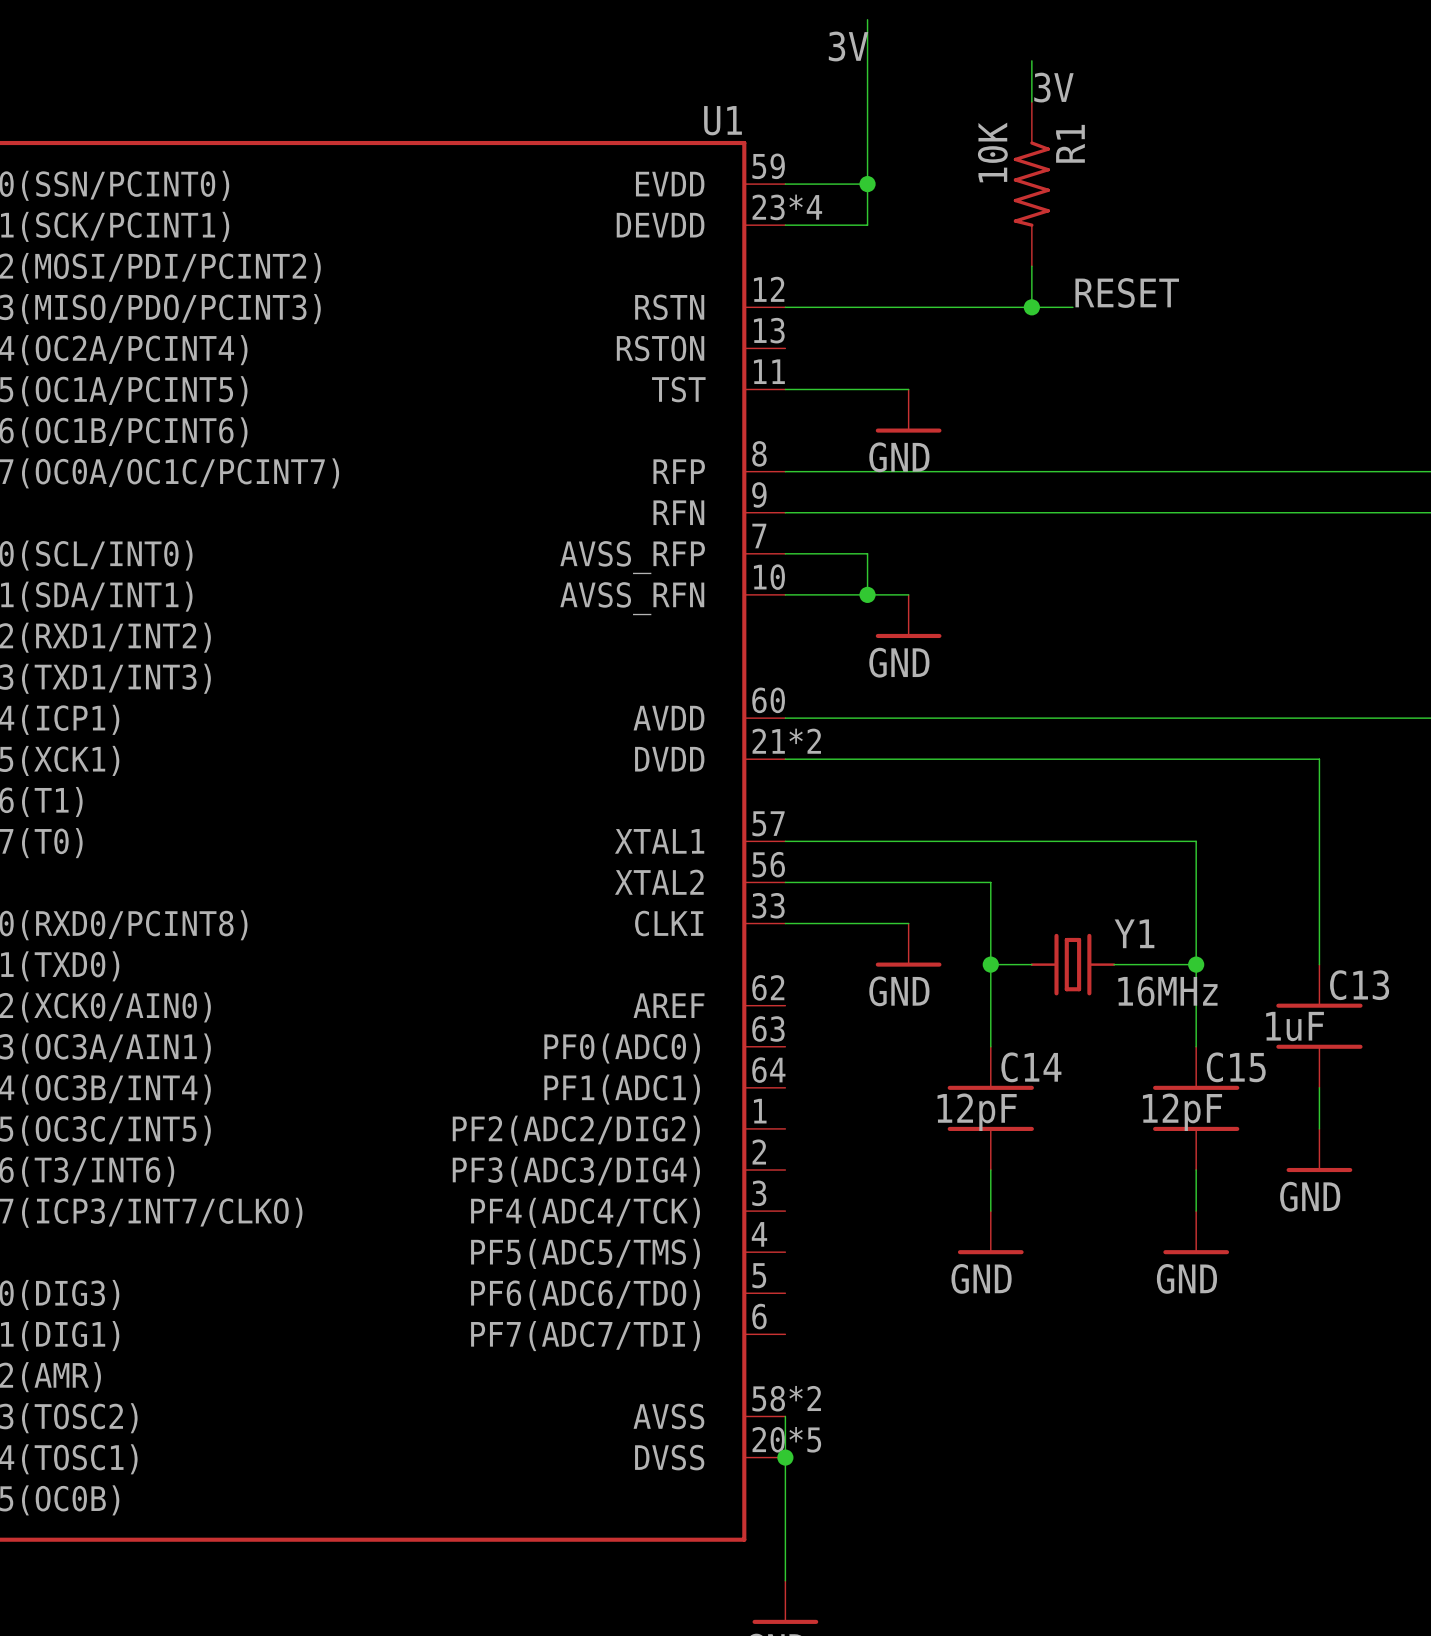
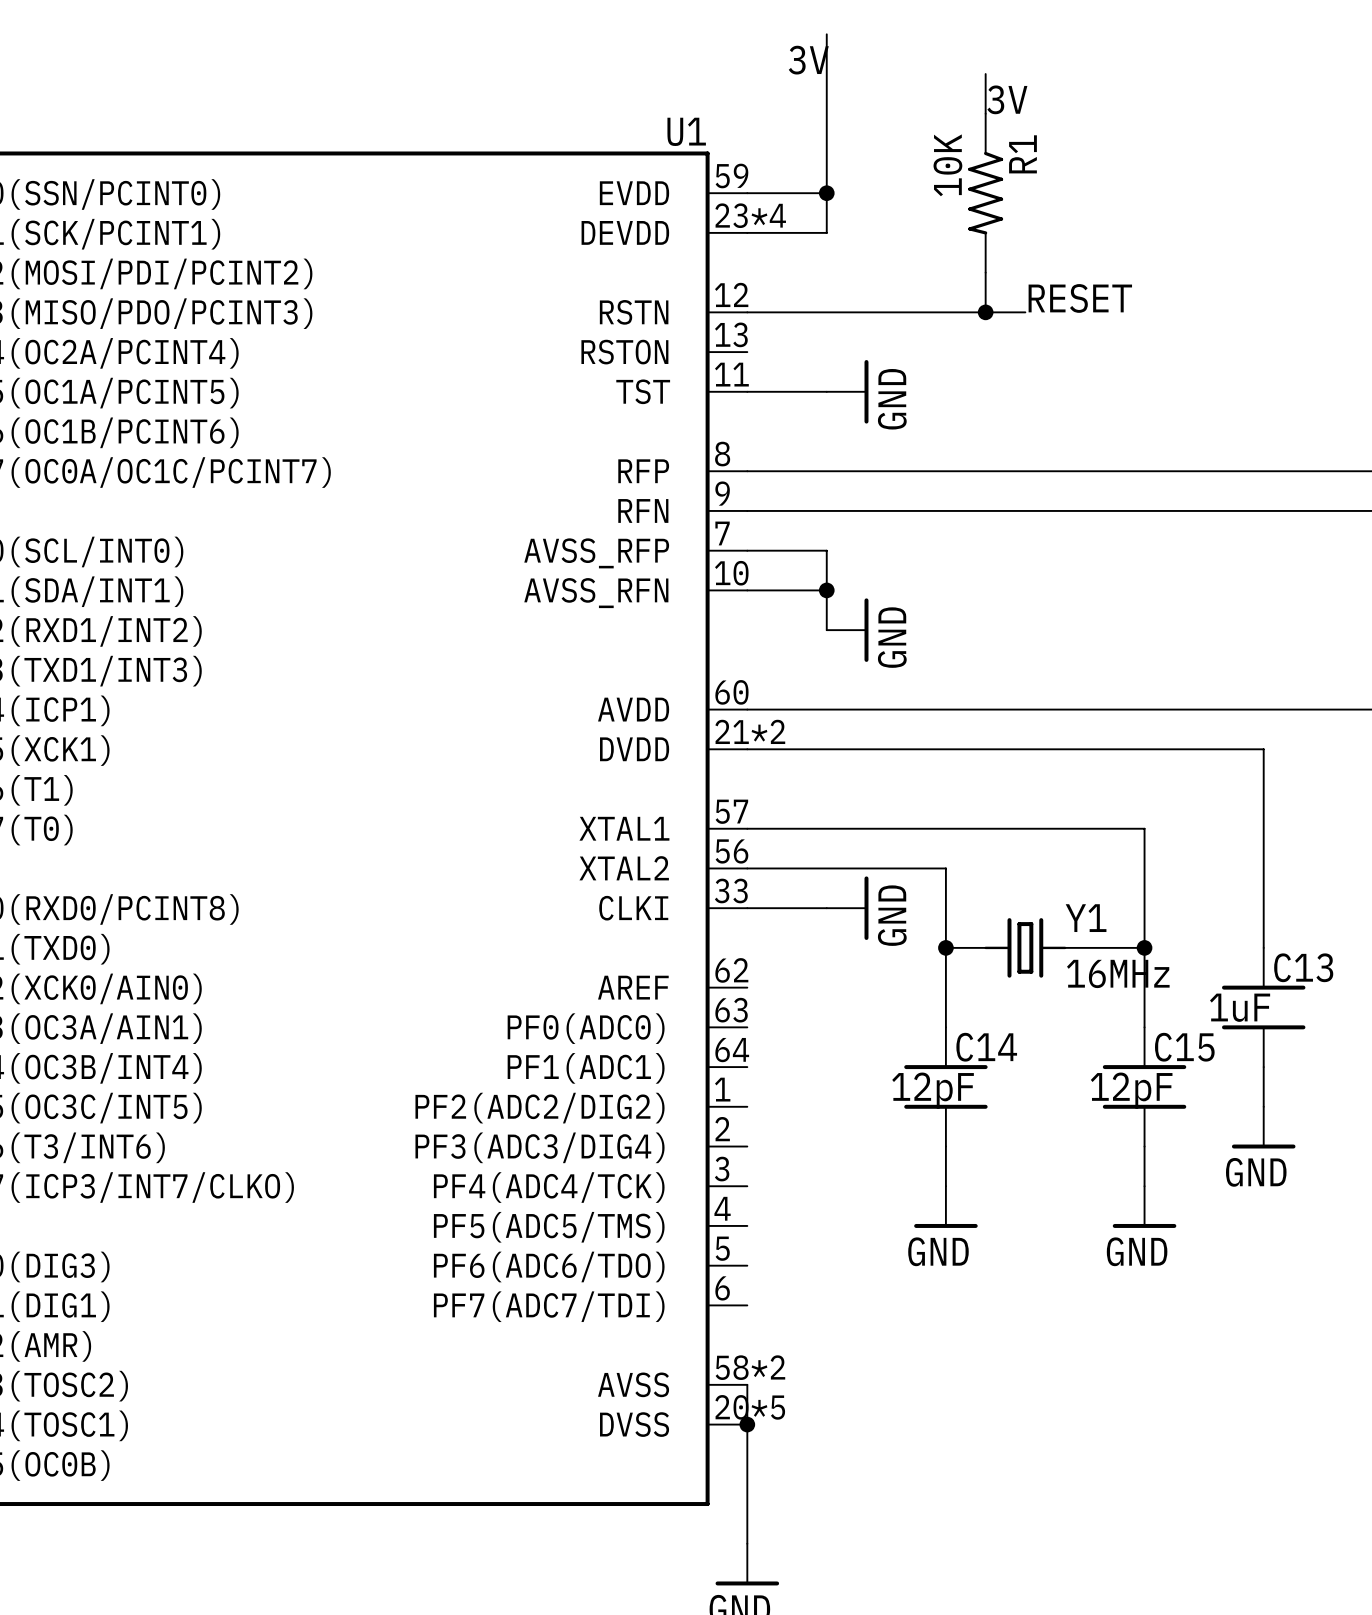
power symbol rotation: 0° (908, 430) -> 90° counterclockwise (866, 391)
wire: (867, 594) (908, 594) -> (826, 590) (826, 630)
power symbol rotation: 0° (908, 635) -> 90° counterclockwise (866, 630)
power symbol rotation: 0° (908, 964) -> 90° counterclockwise (866, 908)

